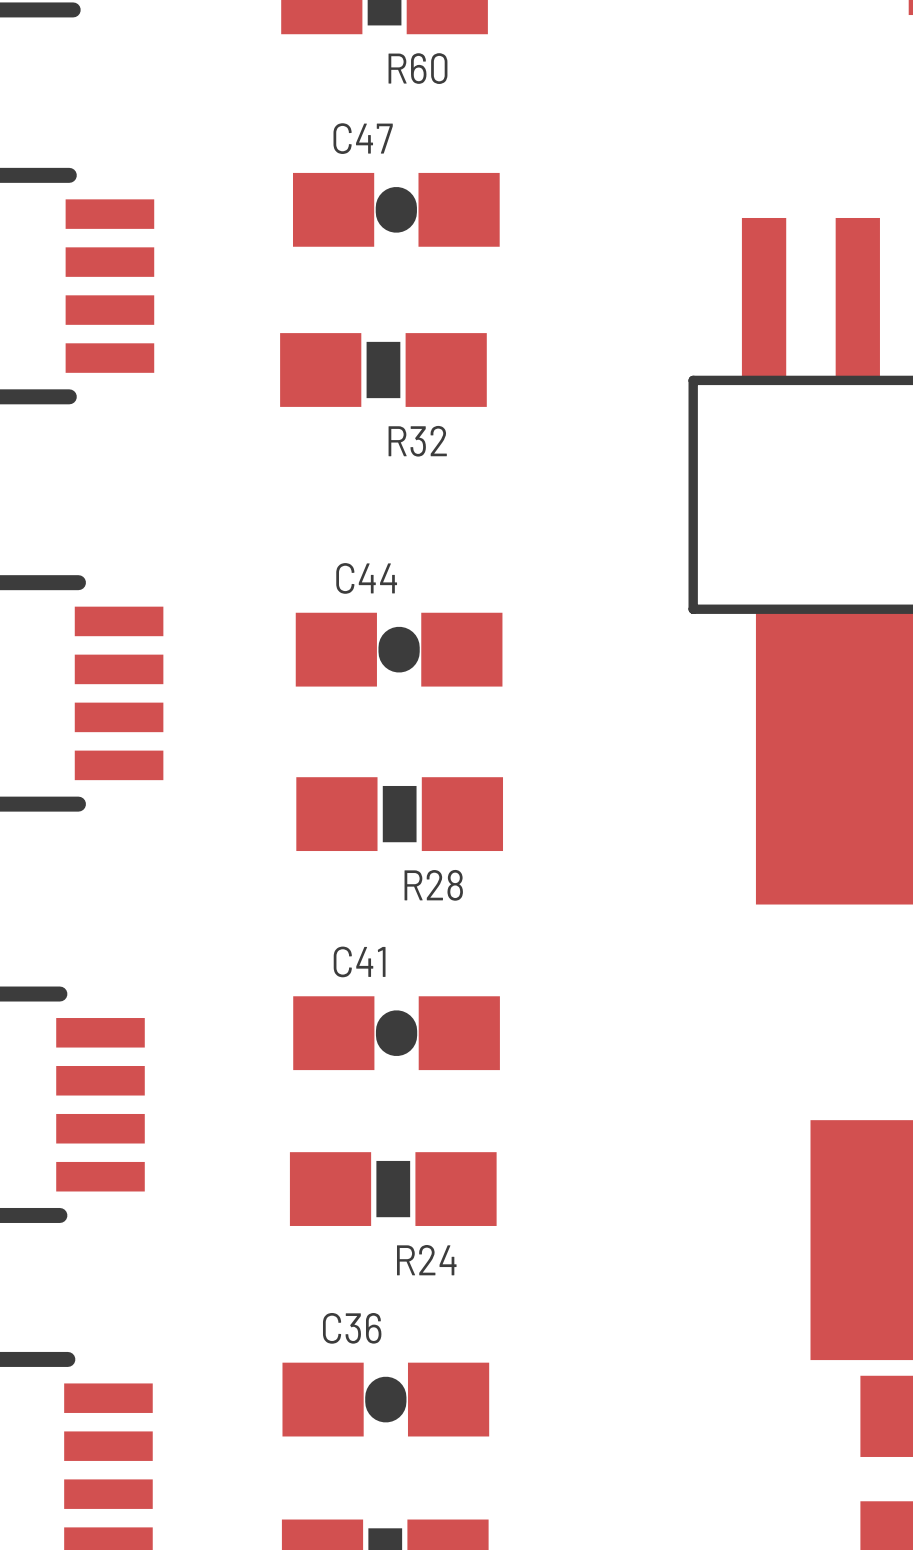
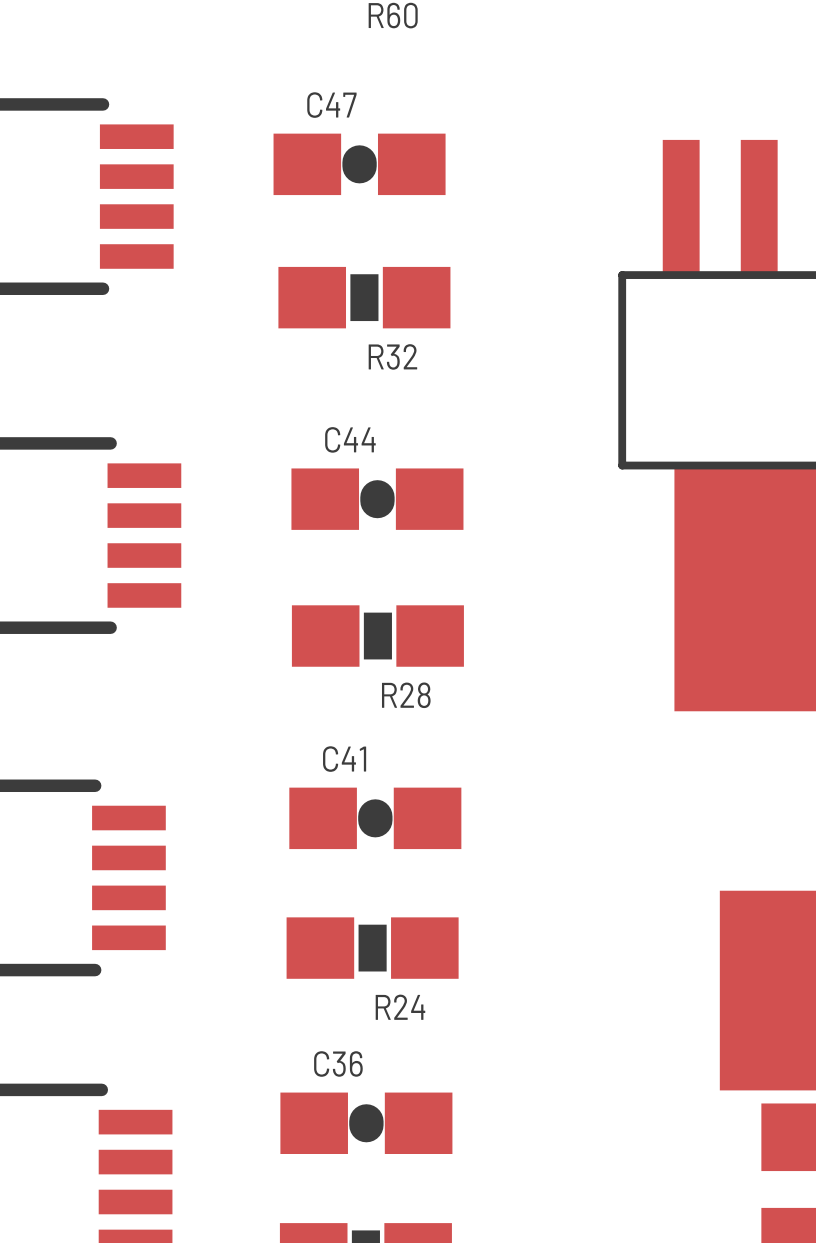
C47 position: (396, 209) -> (359, 164)
R32 position: (383, 370) -> (364, 297)

